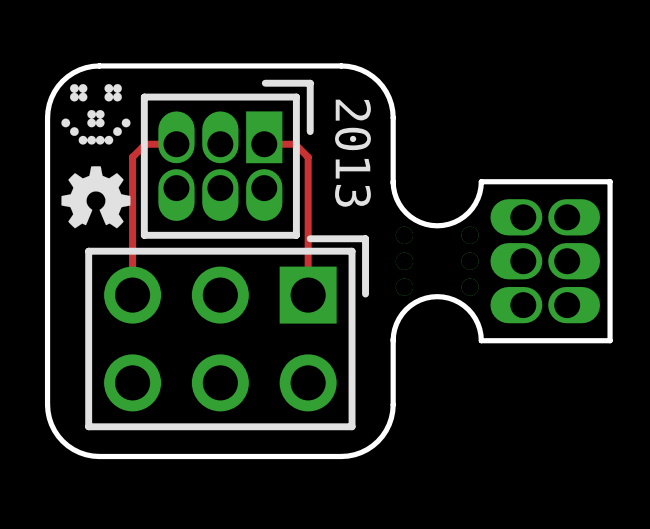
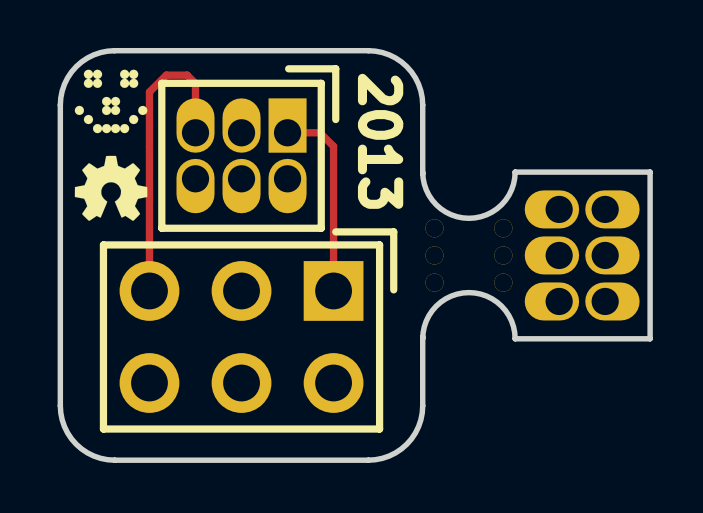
track: (176, 144) (145, 144) (132, 157) -> (195, 132) (195, 83) (187, 75) (166, 75) (149, 92) (149, 146)

